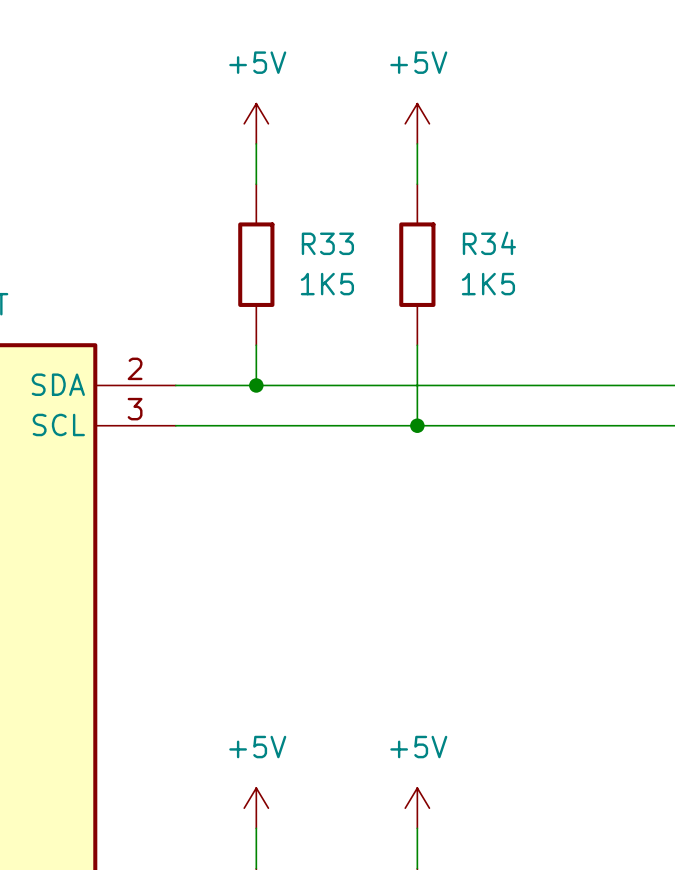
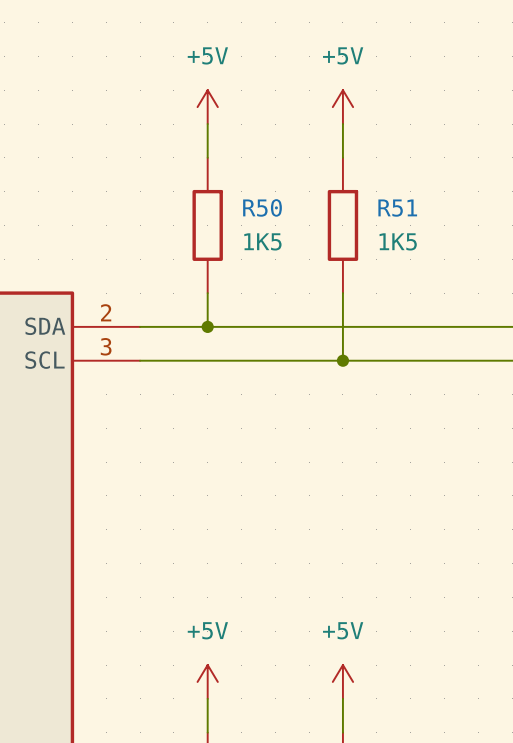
R33 name: R33 (327, 243) -> R50 (262, 207)
R34 name: R34 (489, 243) -> R51 (397, 208)

